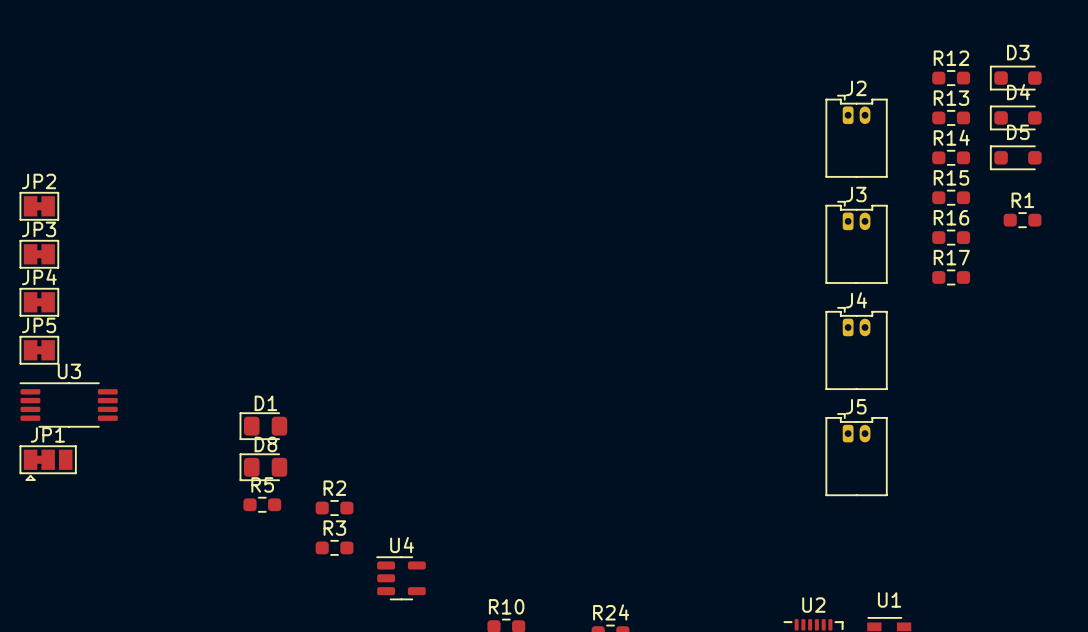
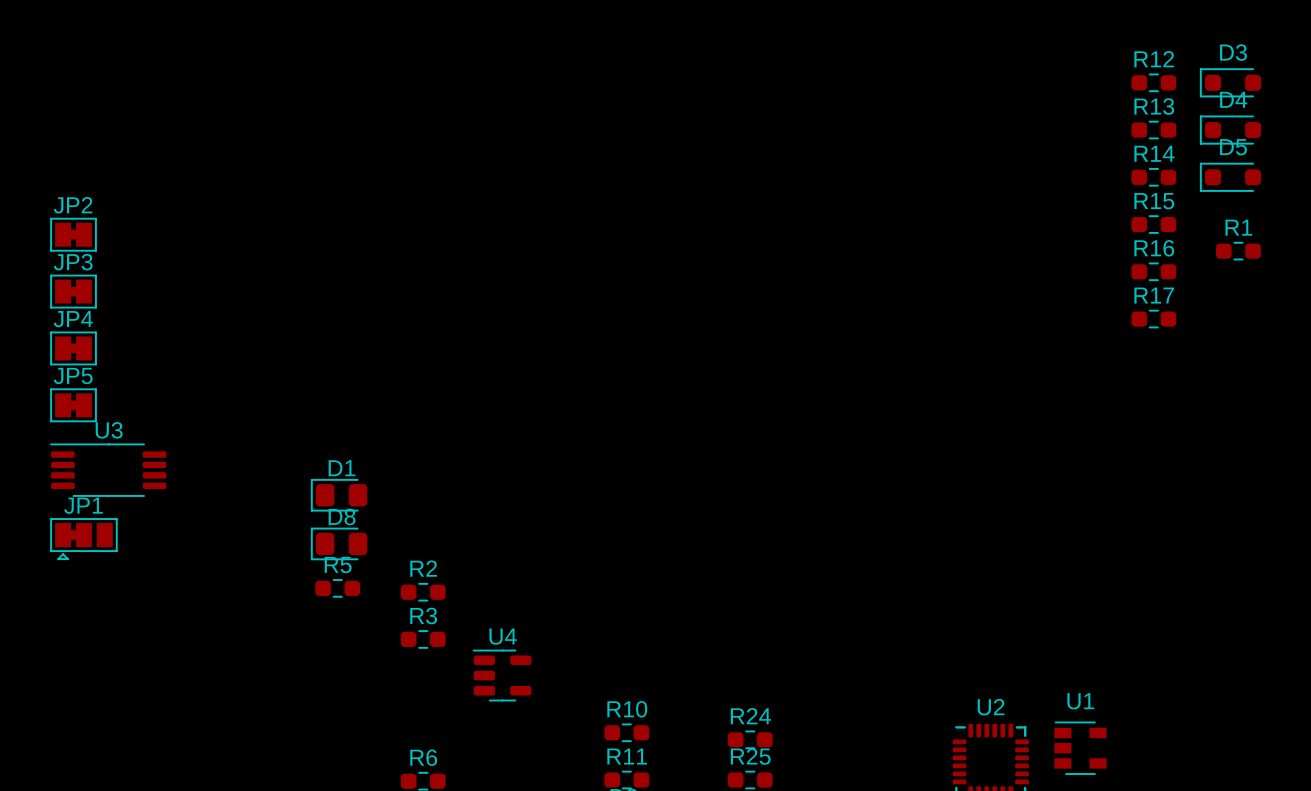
J2: (856, 136) -> none
J3: (856, 242) -> none
J4: (856, 348) -> none
J5: (856, 454) -> none

